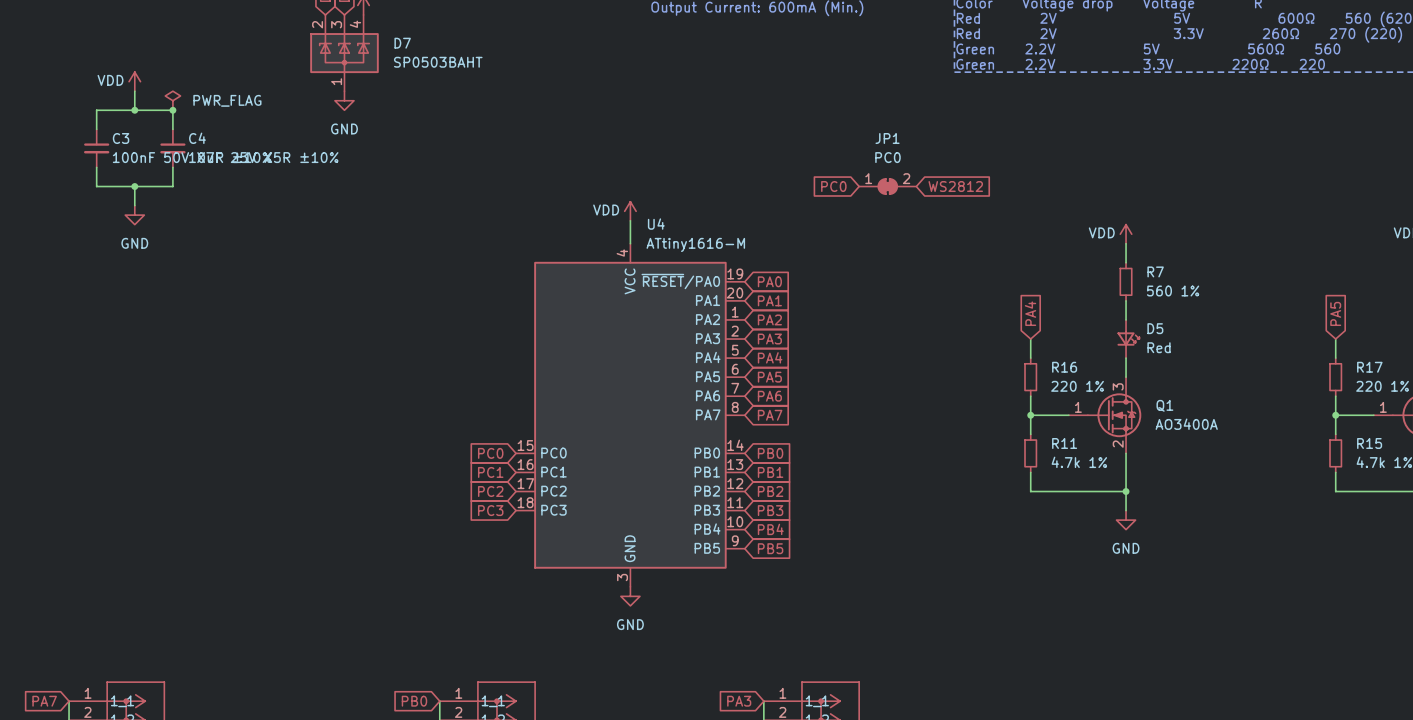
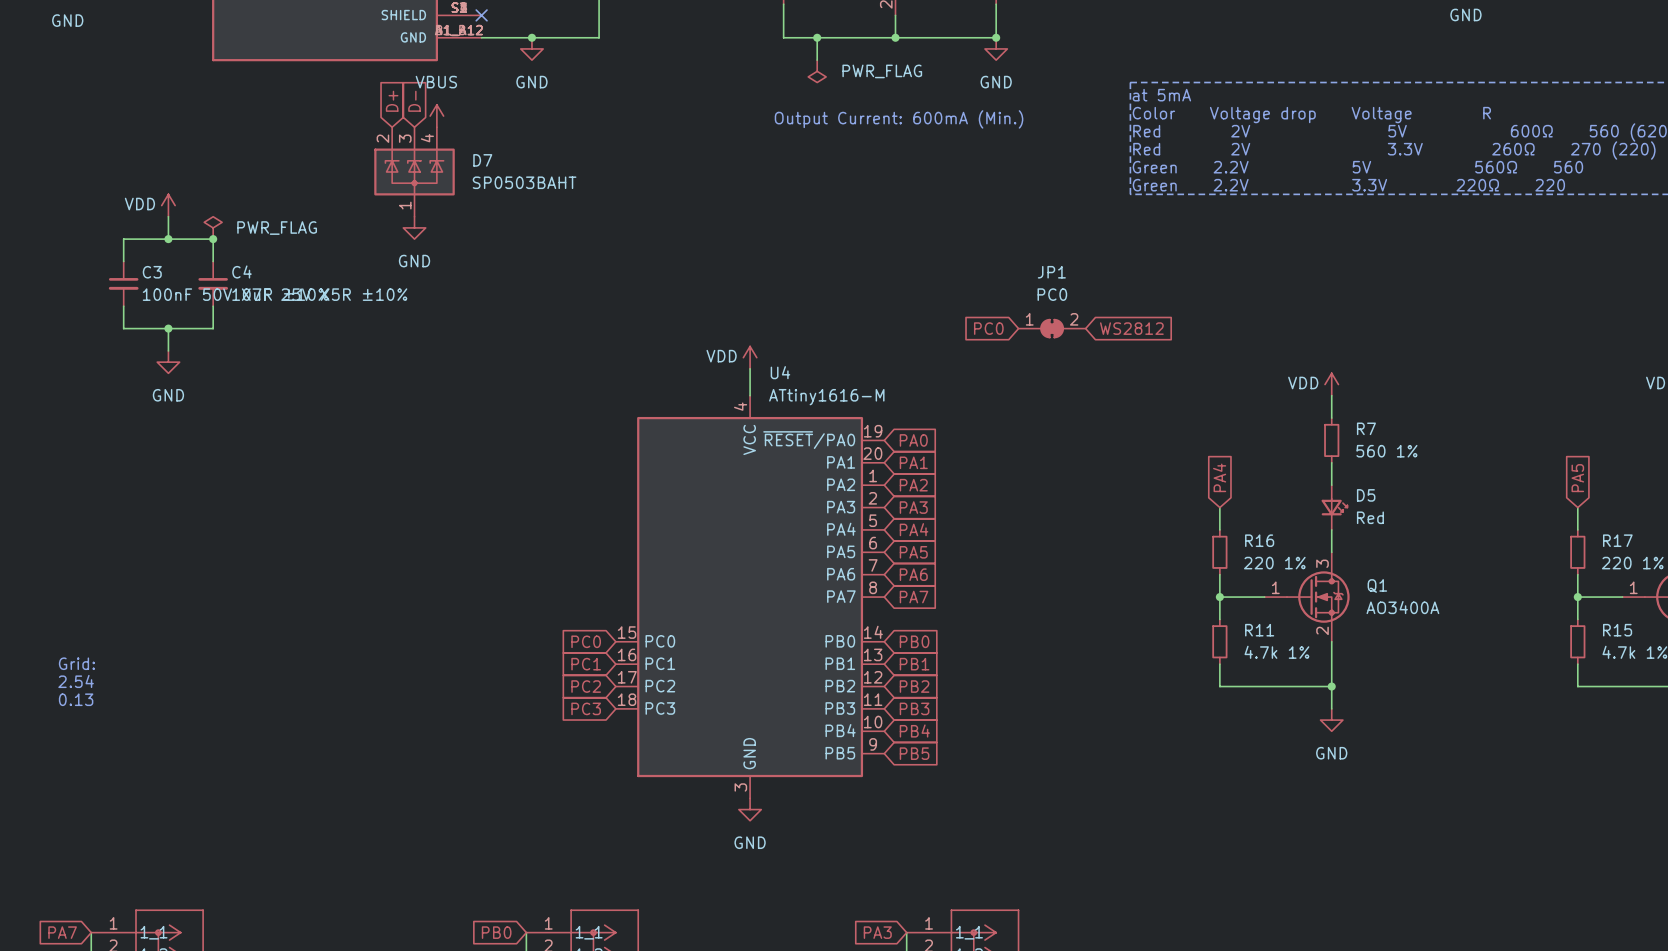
text: none -> Grid: (76, 663)
text: none -> 2.54 (76, 681)
text: none -> 0.13 (76, 699)

